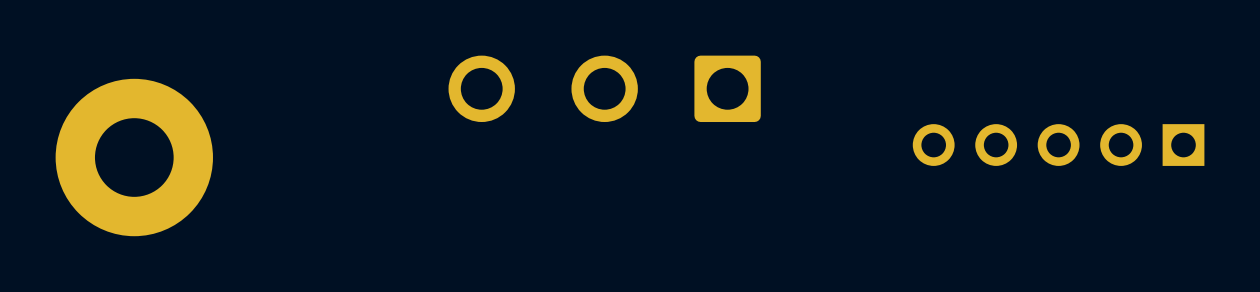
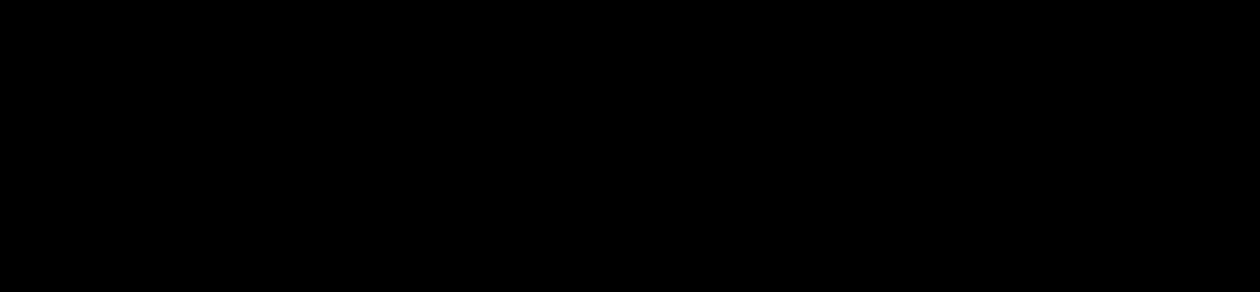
part: (604, 88) -> none
part: (1058, 145) -> none
part: (134, 157) -> none

